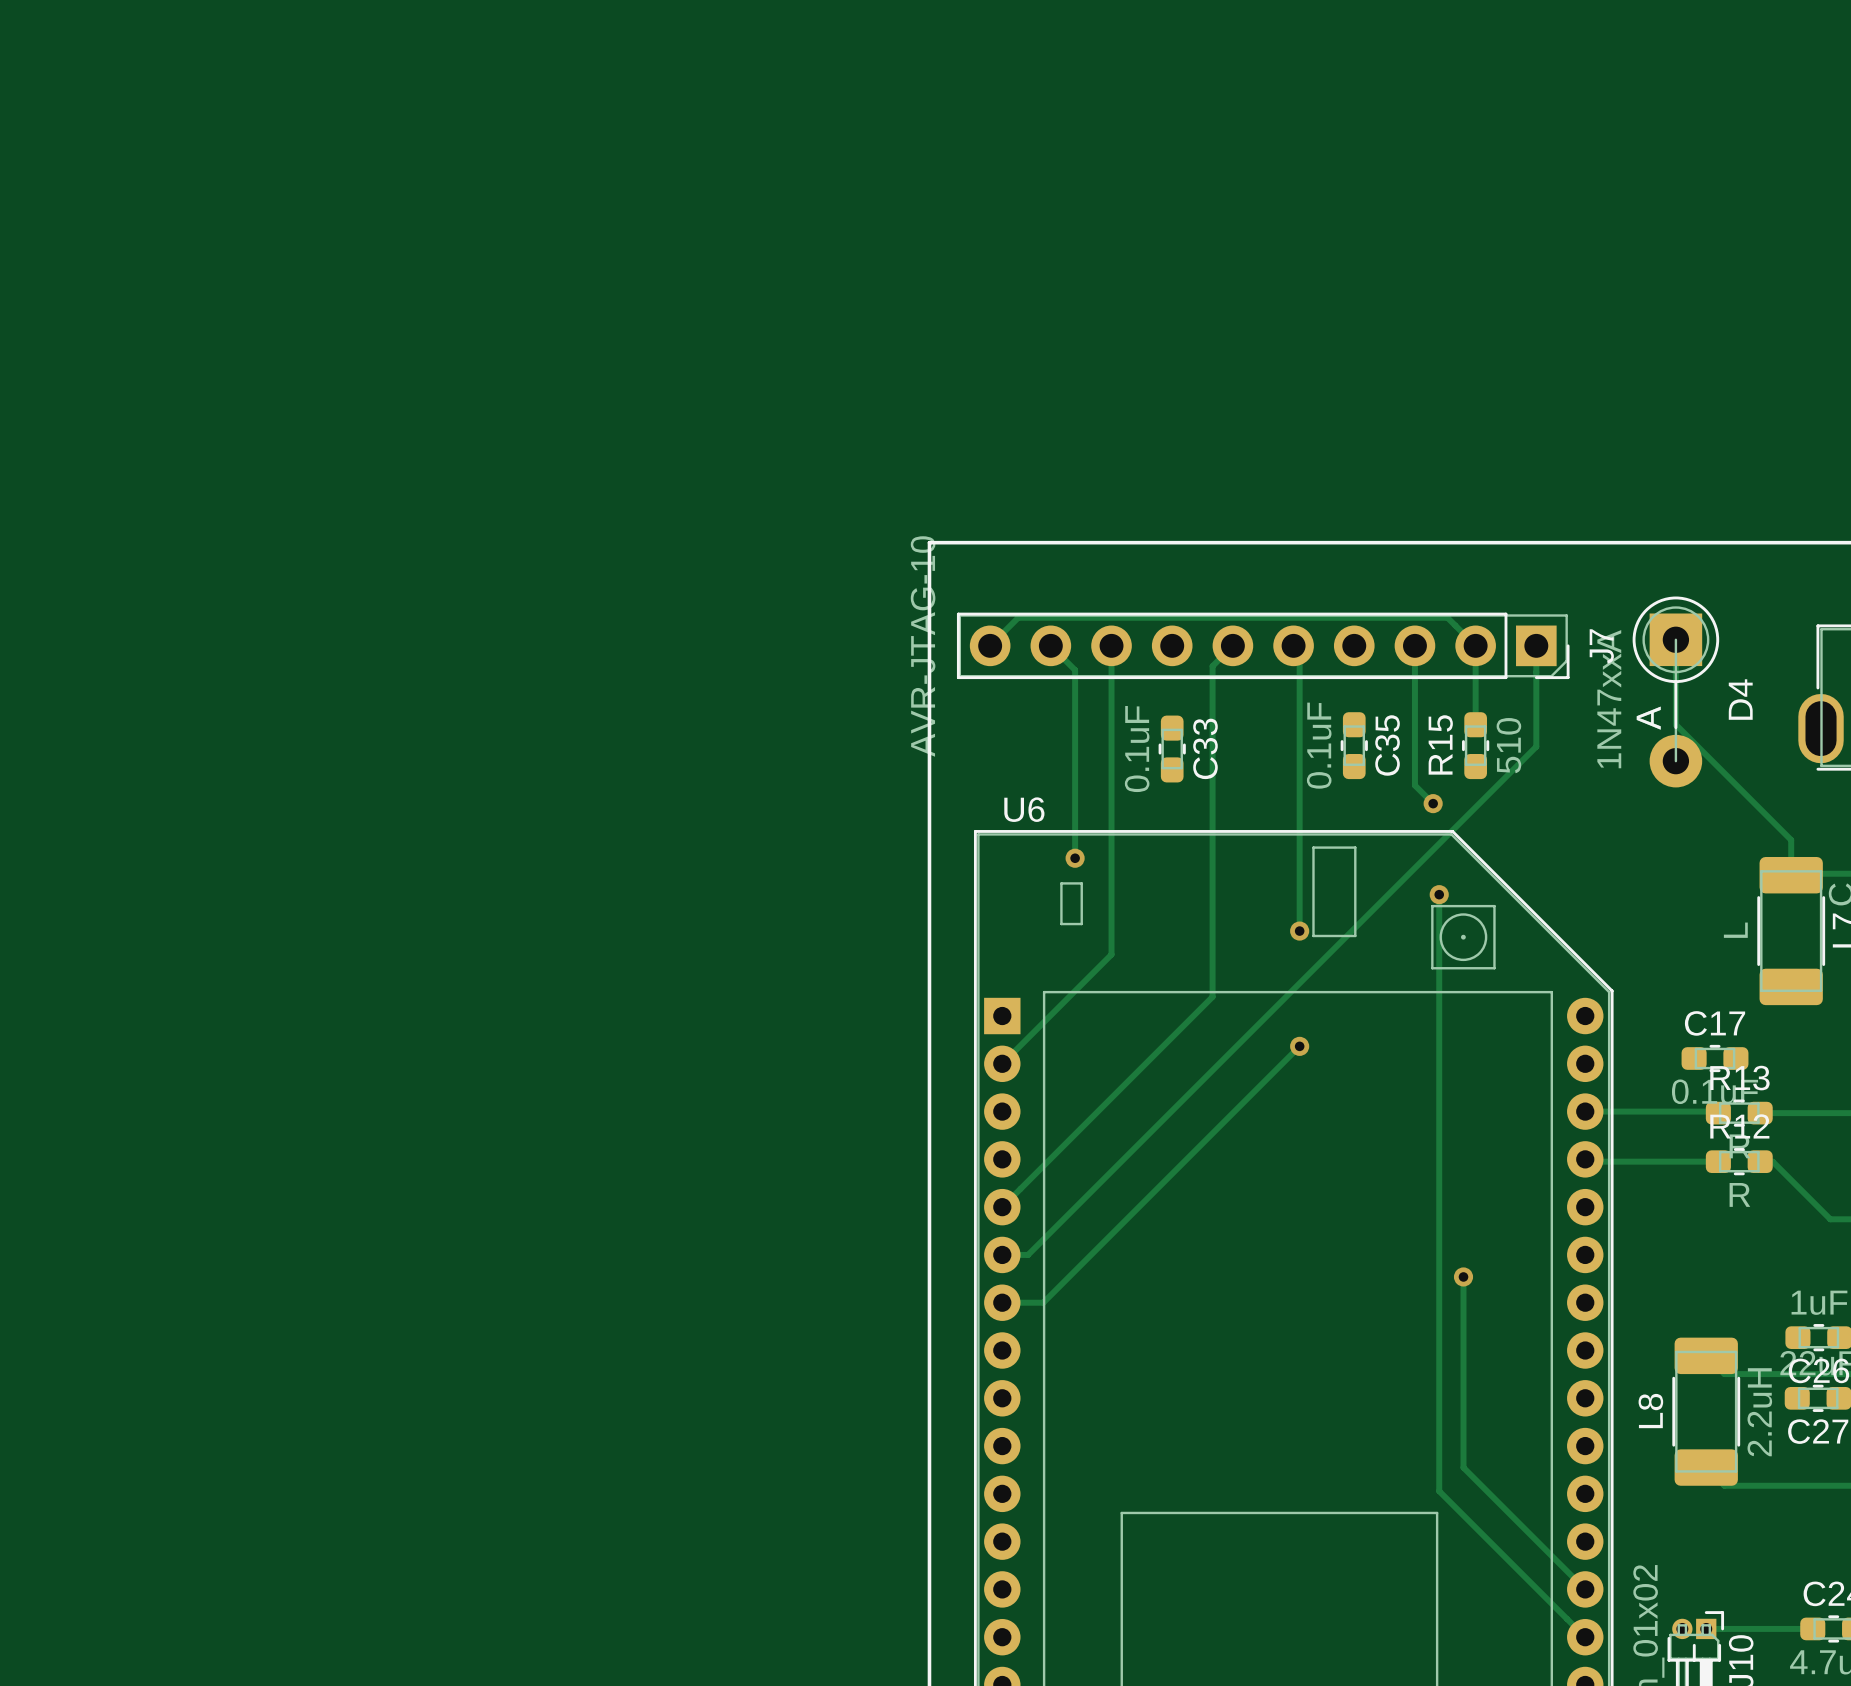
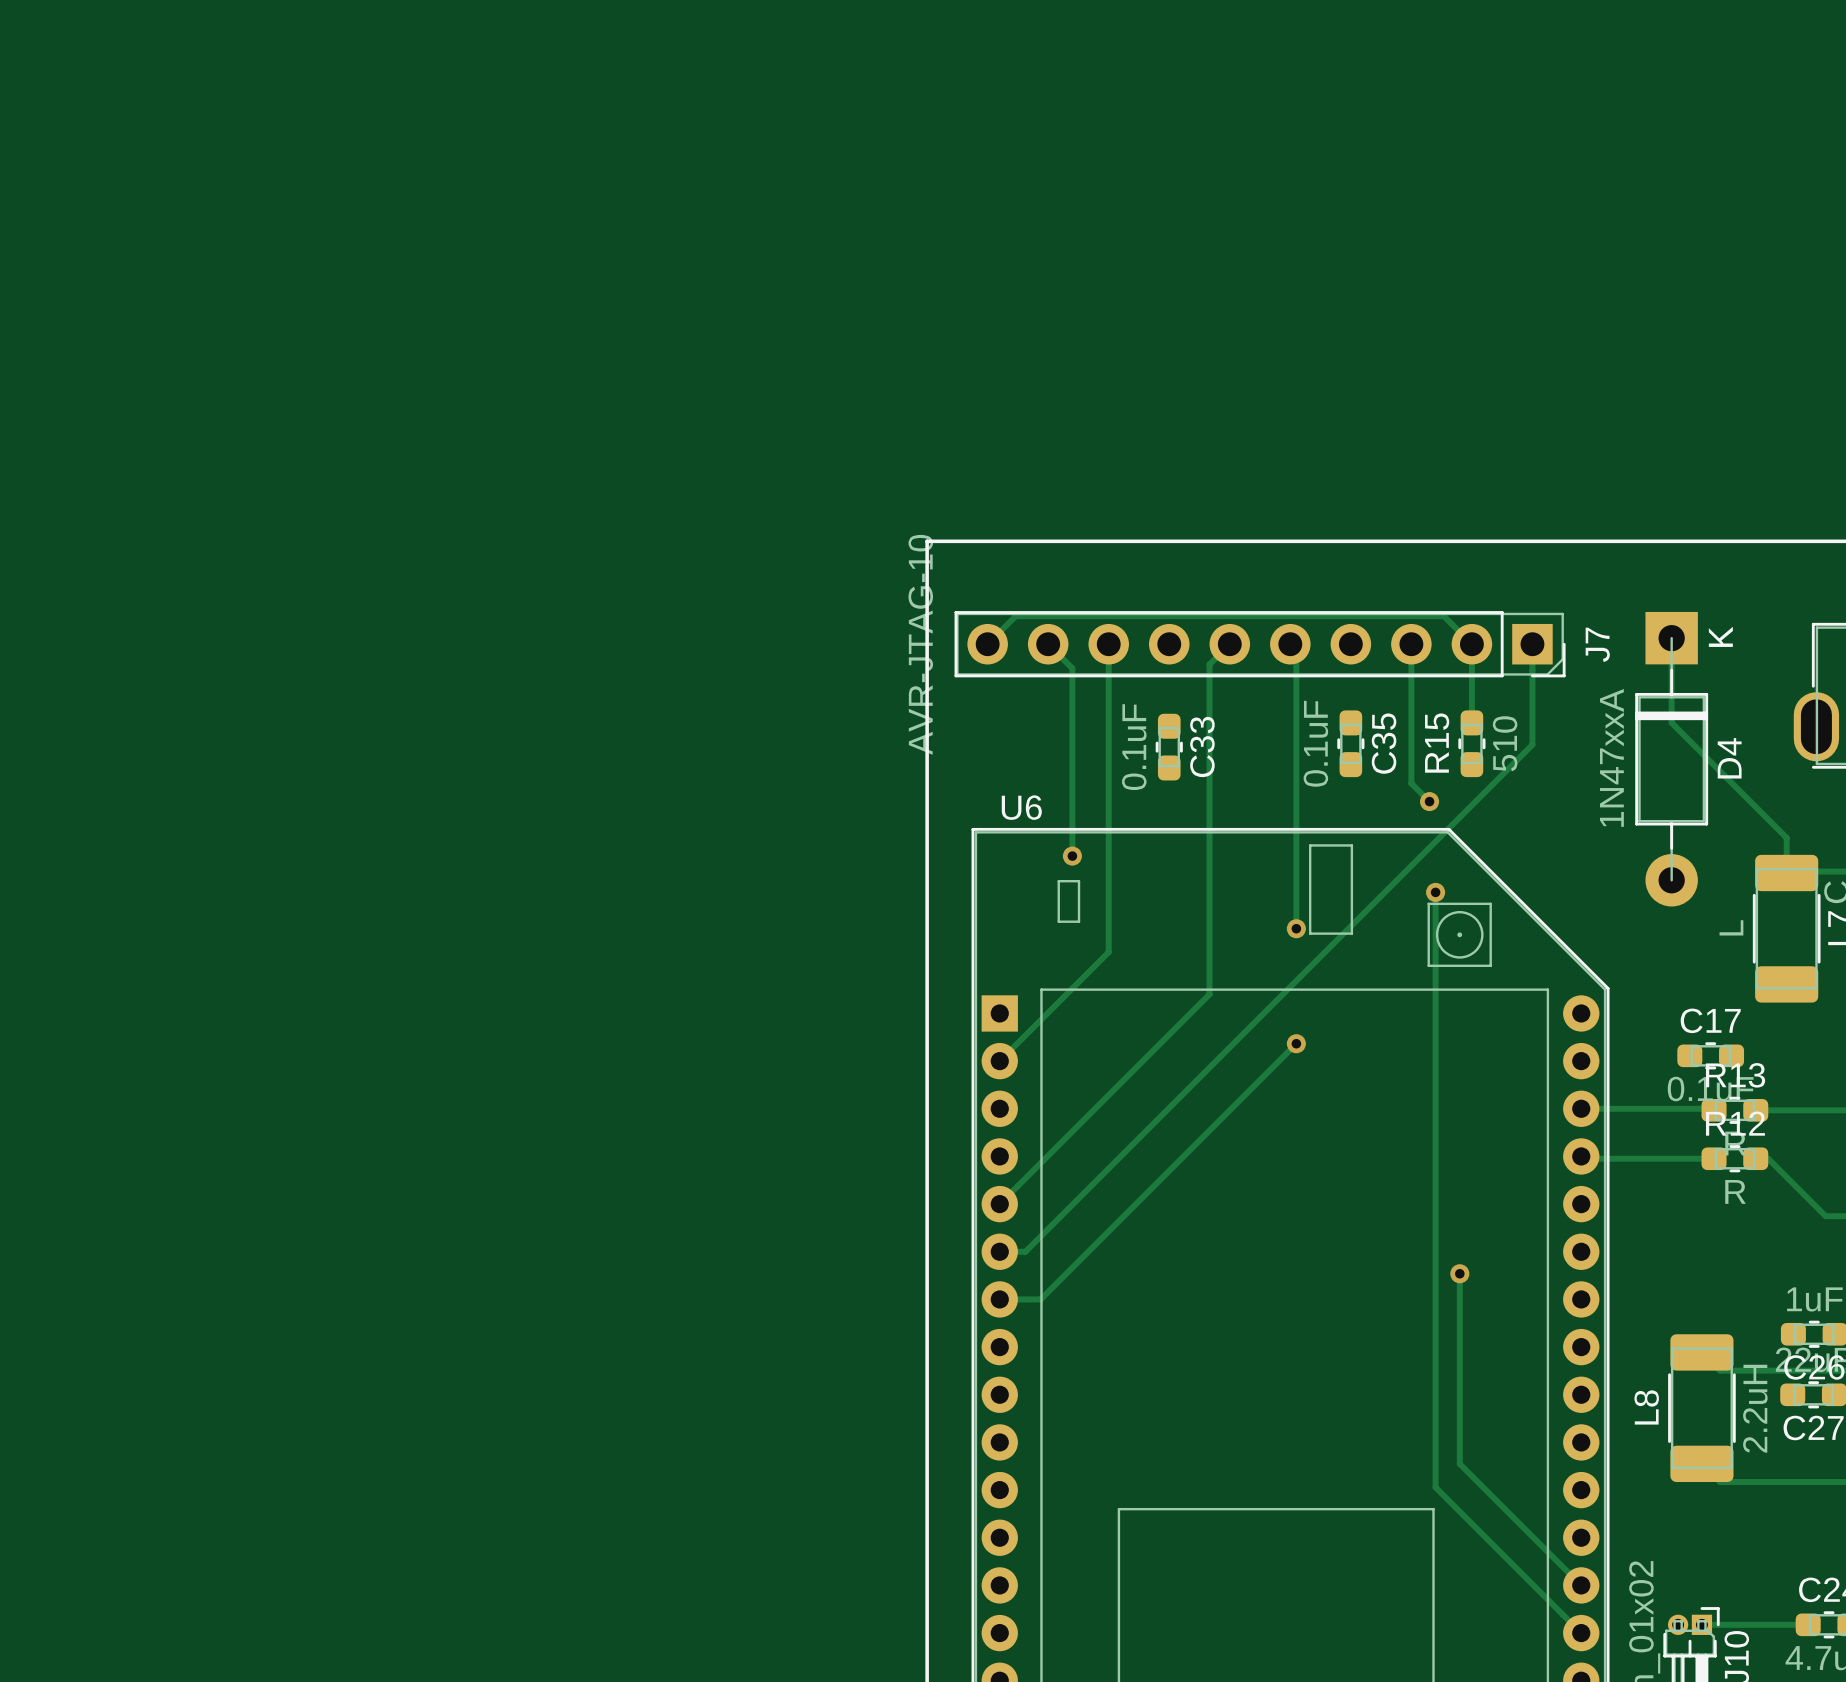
D4 footprint: [1632, 596, 1720, 788] -> [1635, 611, 1709, 907]

